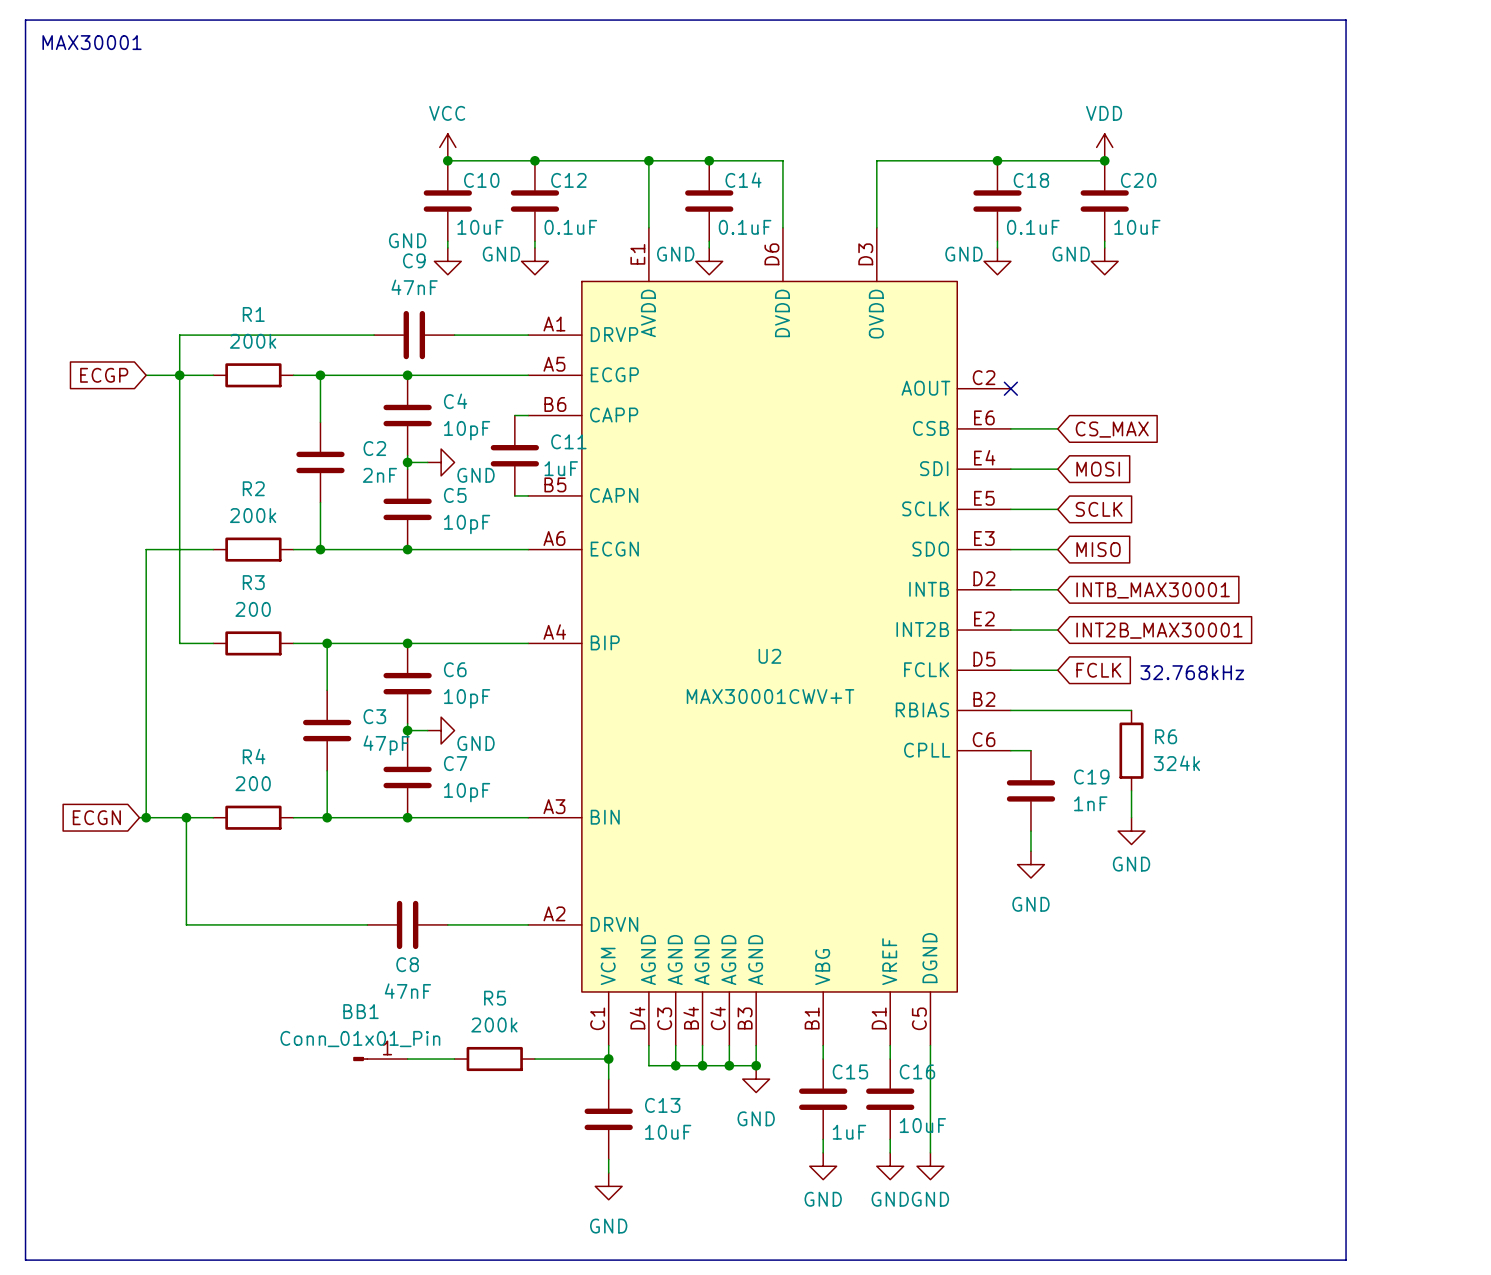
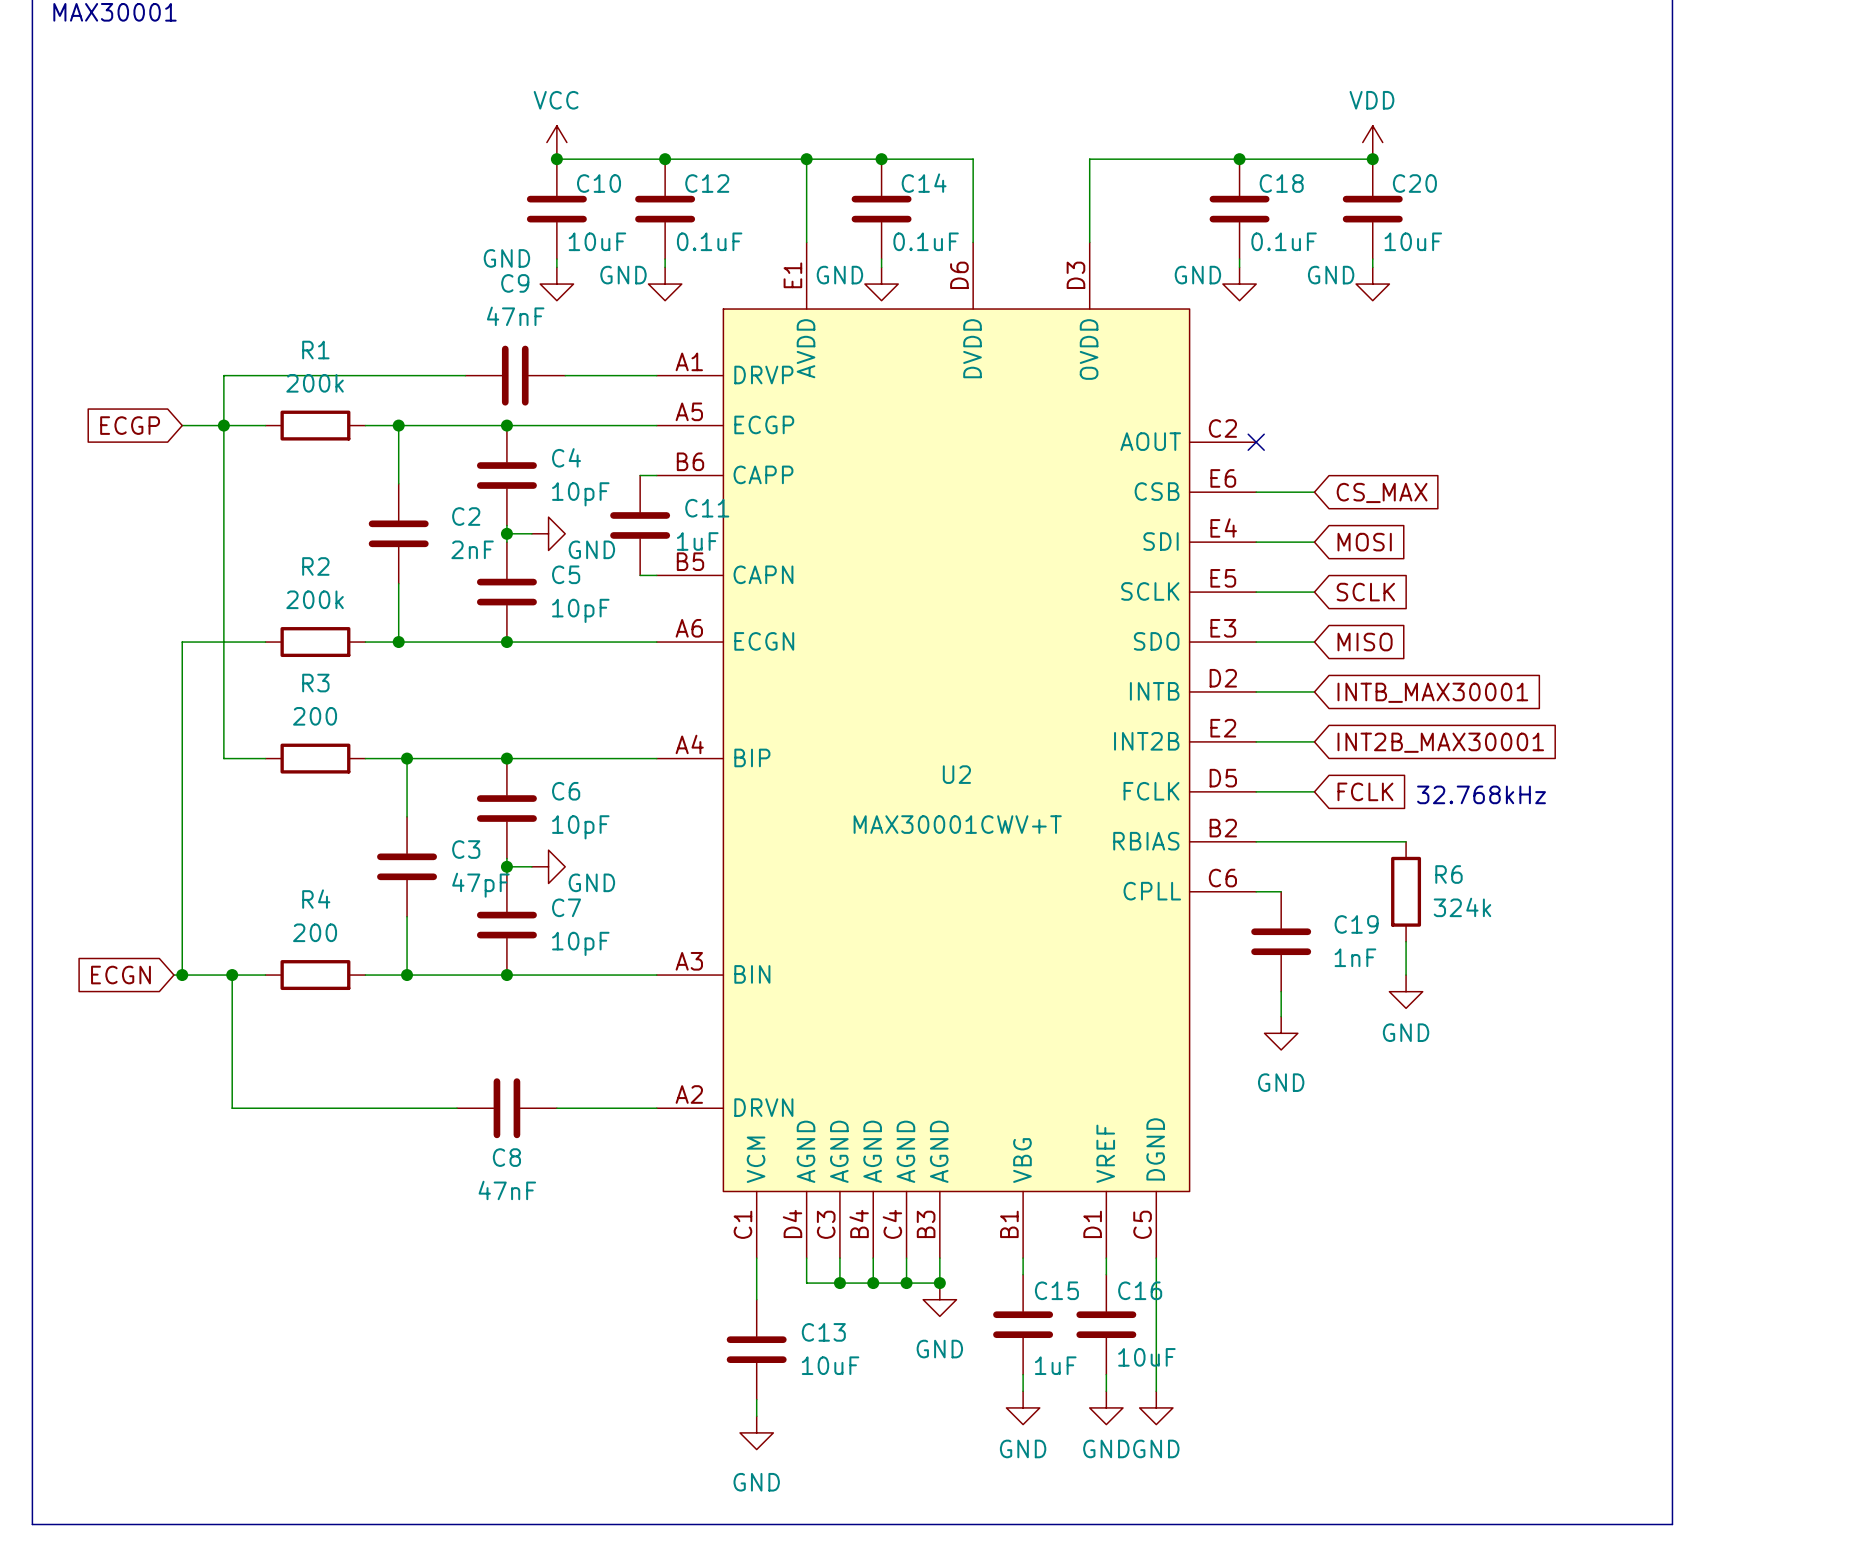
BB1: Conn_01x01_Pin (380, 1059) -> none
wire: (407, 1059) (454, 1059) -> none
R5: 200k (494, 1059) -> none
wire: (534, 1059) (608, 1059) -> none
junction: (608, 1059) -> none

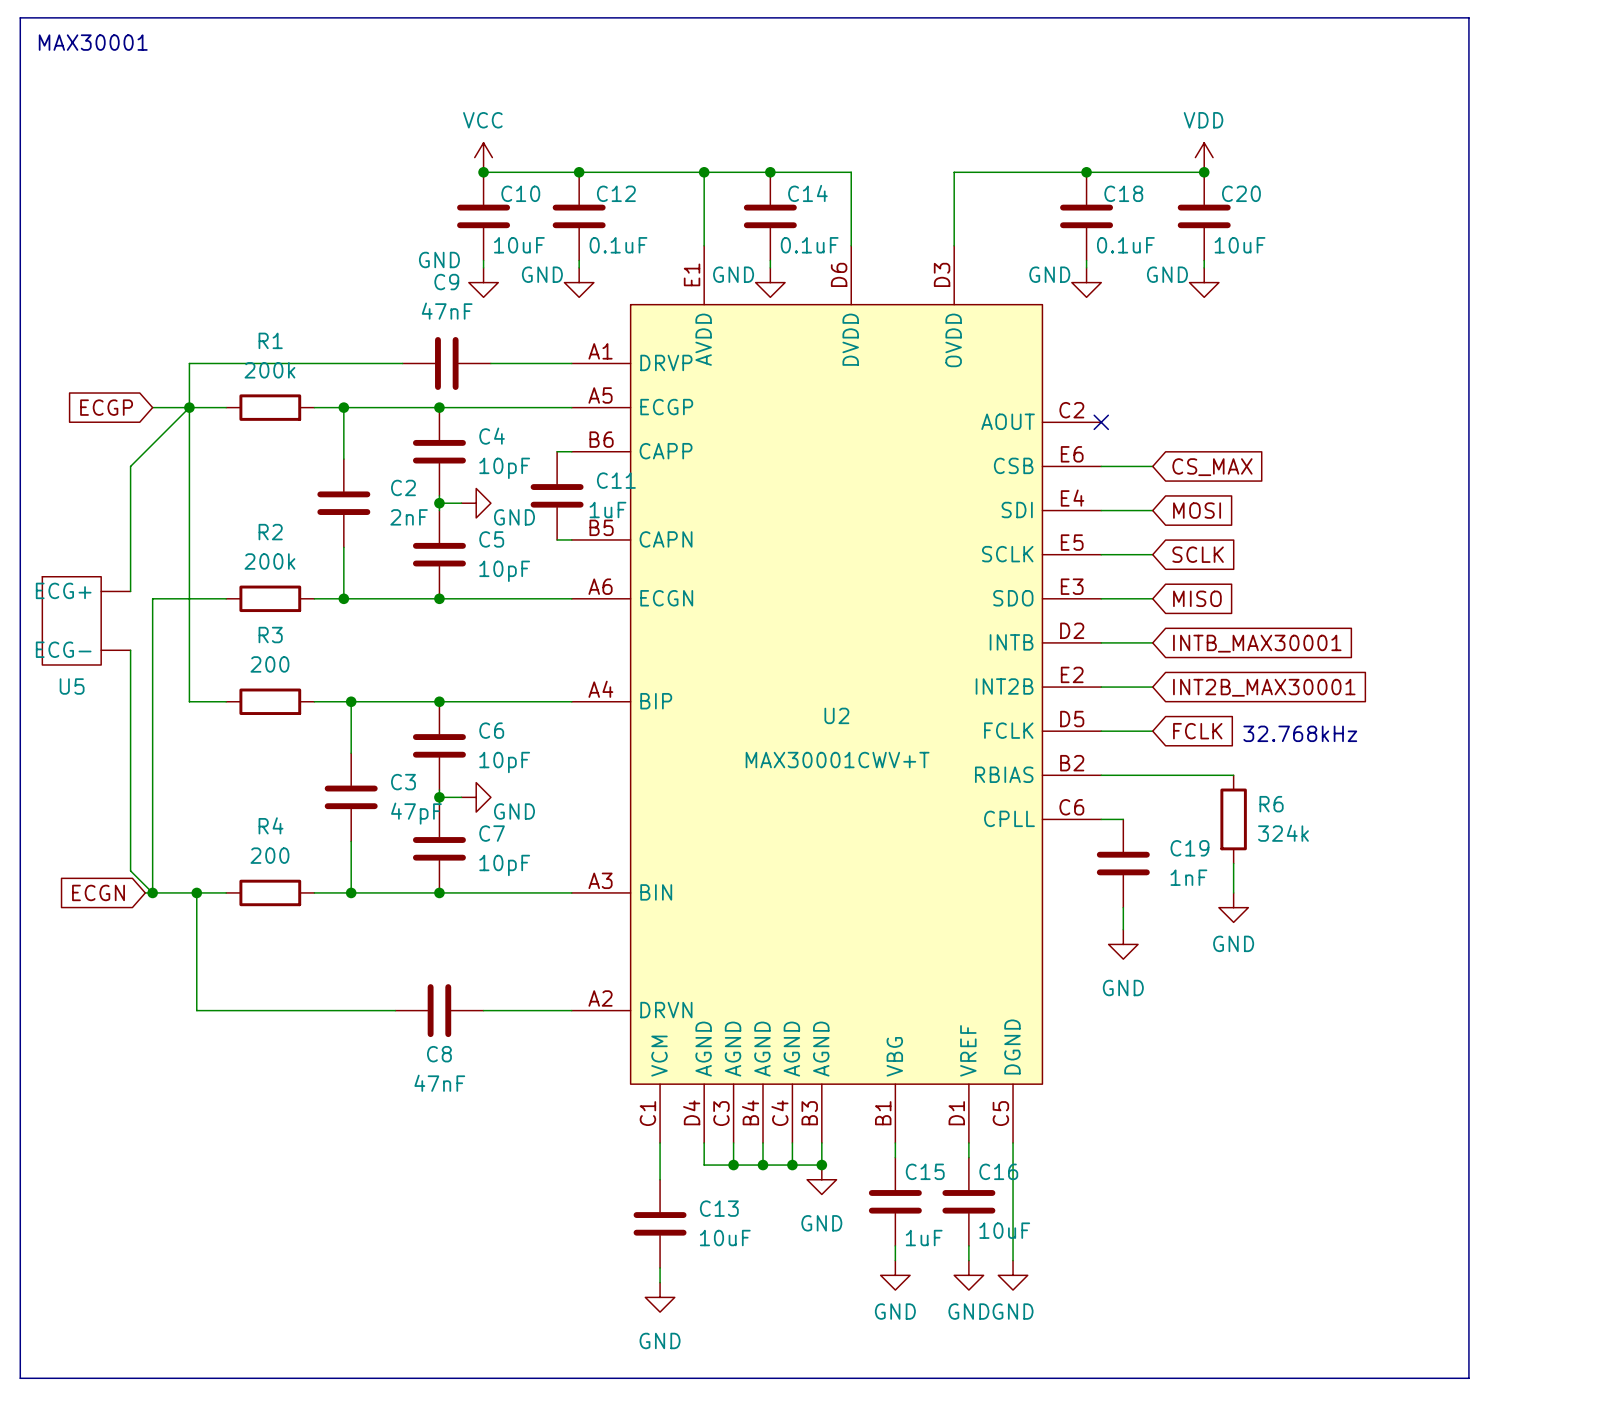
wire: none -> (189, 407) (130, 466) (130, 591)
U5: none -> (86, 620)
wire: none -> (130, 650) (130, 870) (152, 892)

